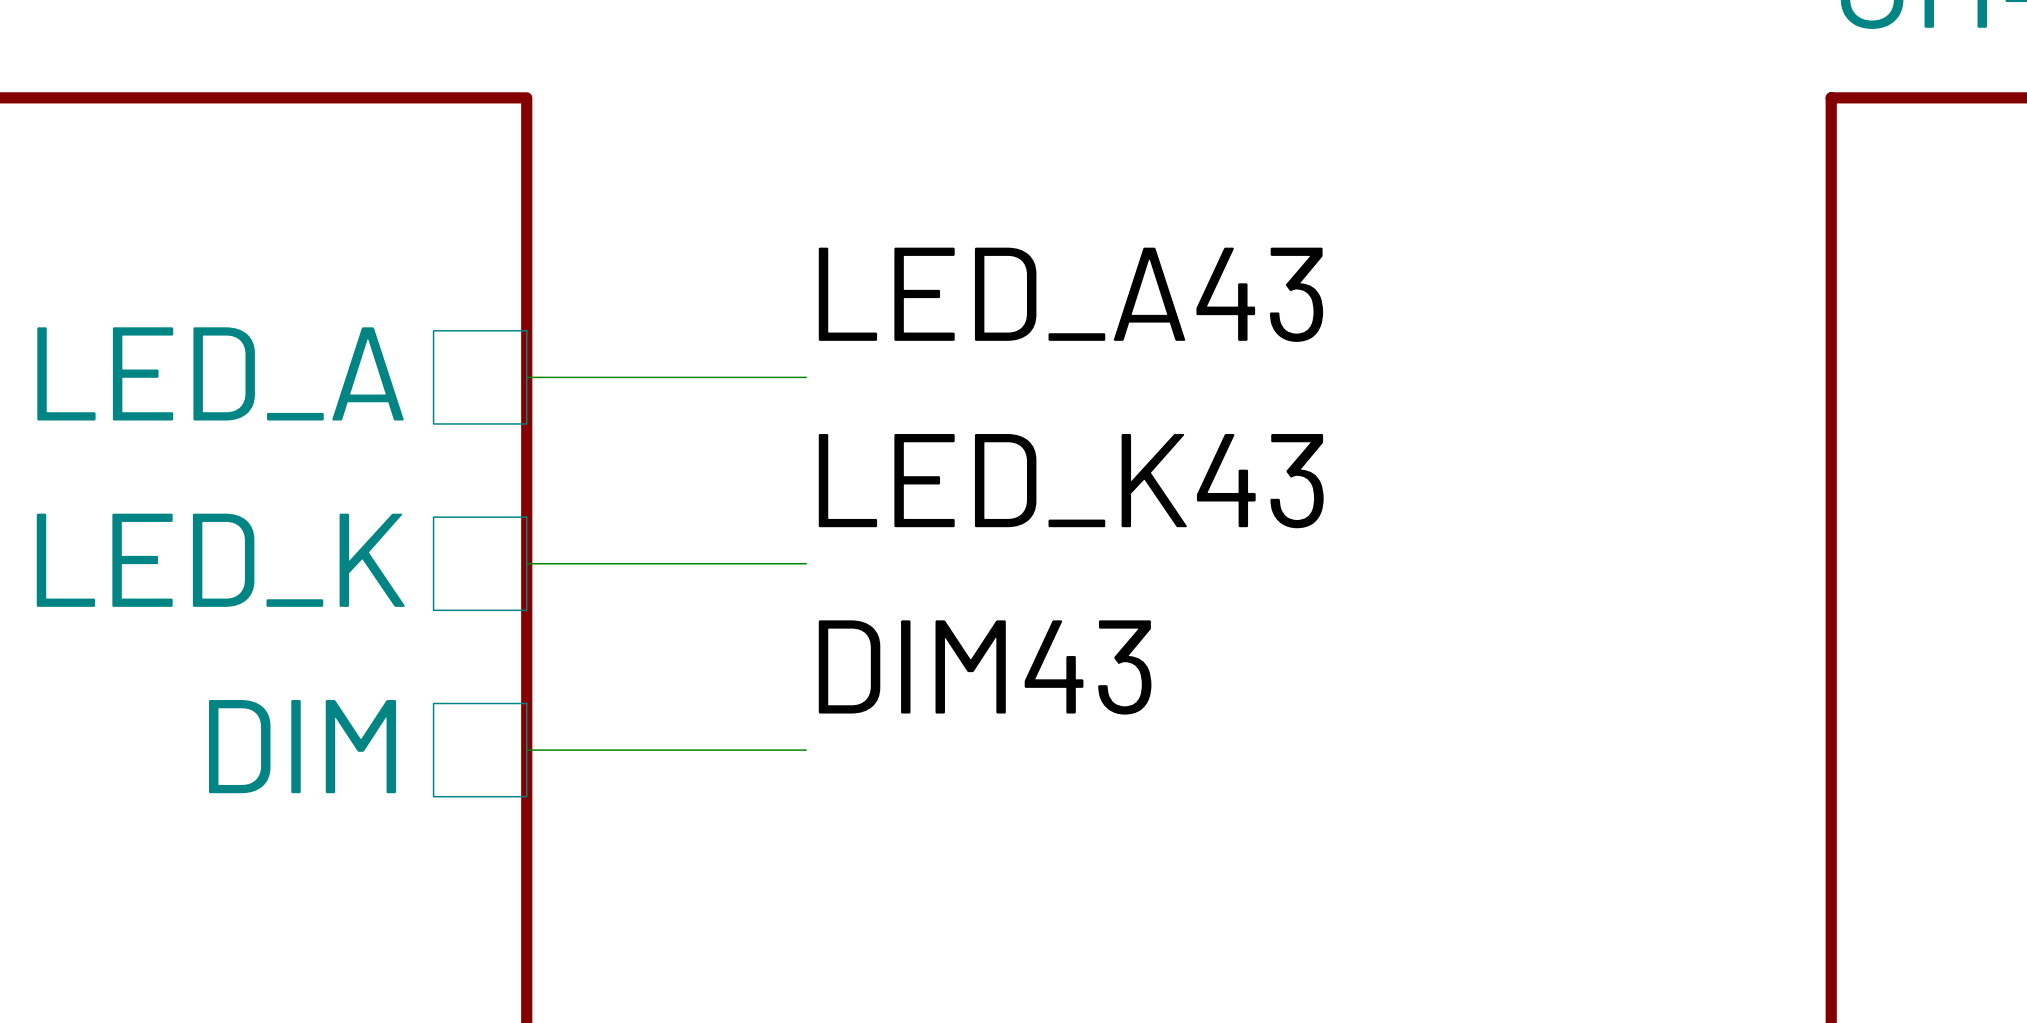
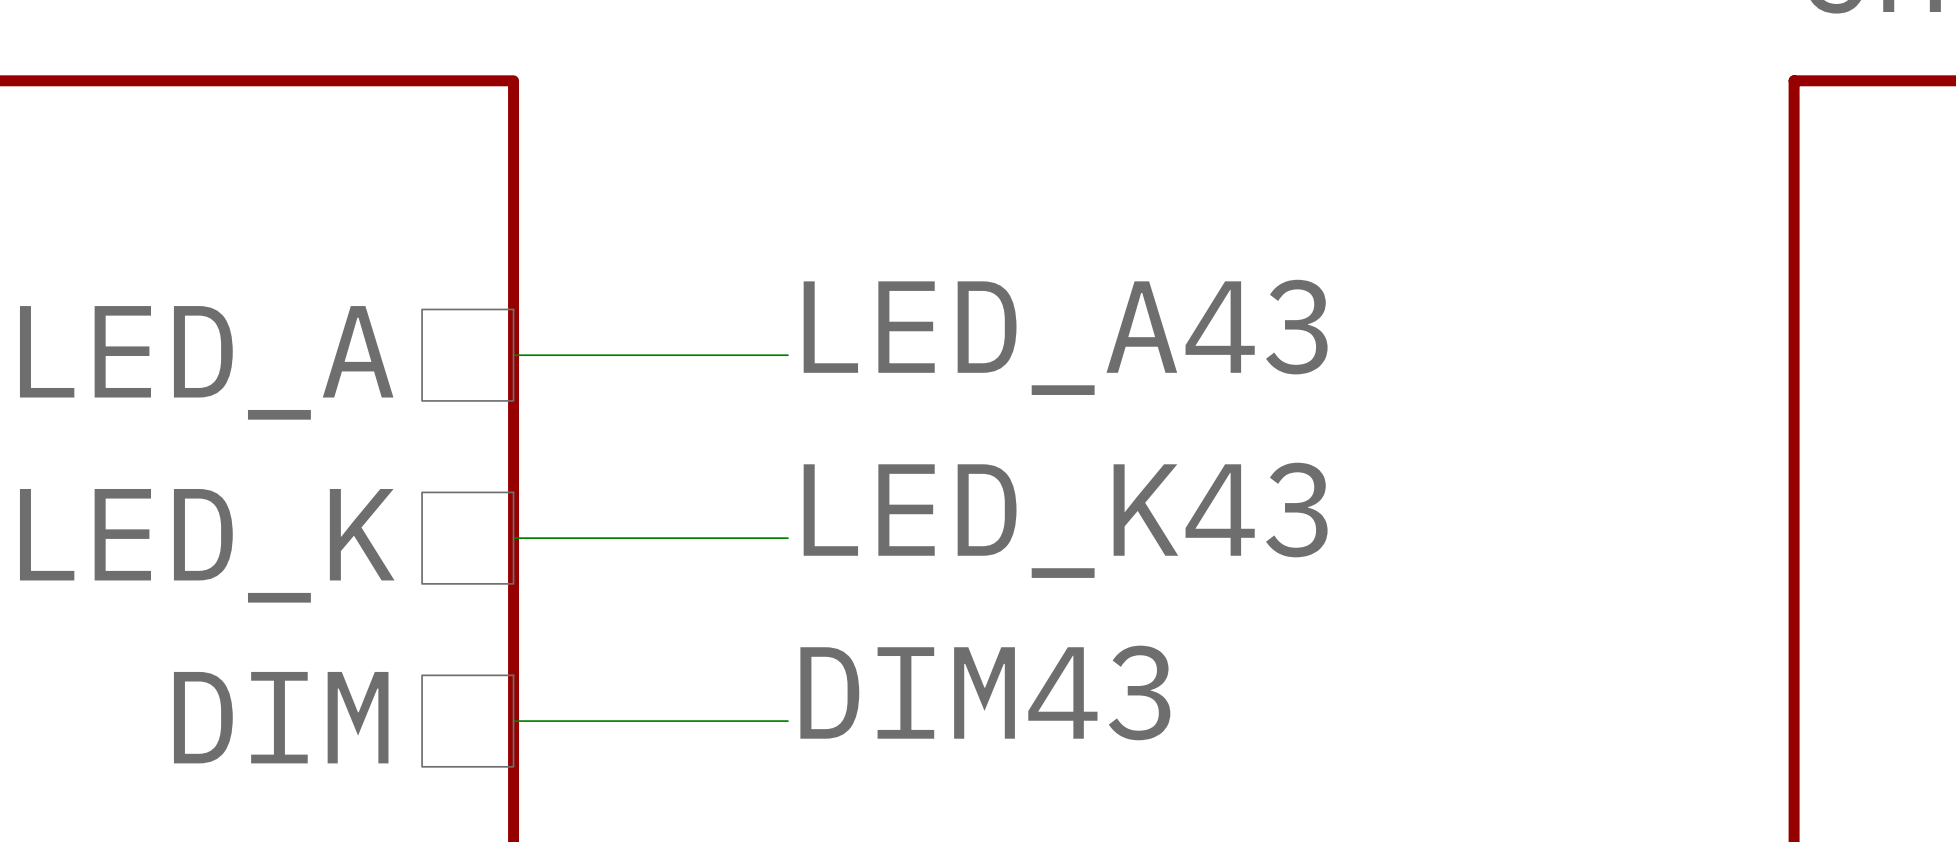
label position: LED_A43 (1070, 294) -> LED_A43 (1065, 337)
label position: LED_K43 (1071, 481) -> LED_K43 (1065, 520)
label position: DIM43 (985, 667) -> DIM43 (985, 692)

